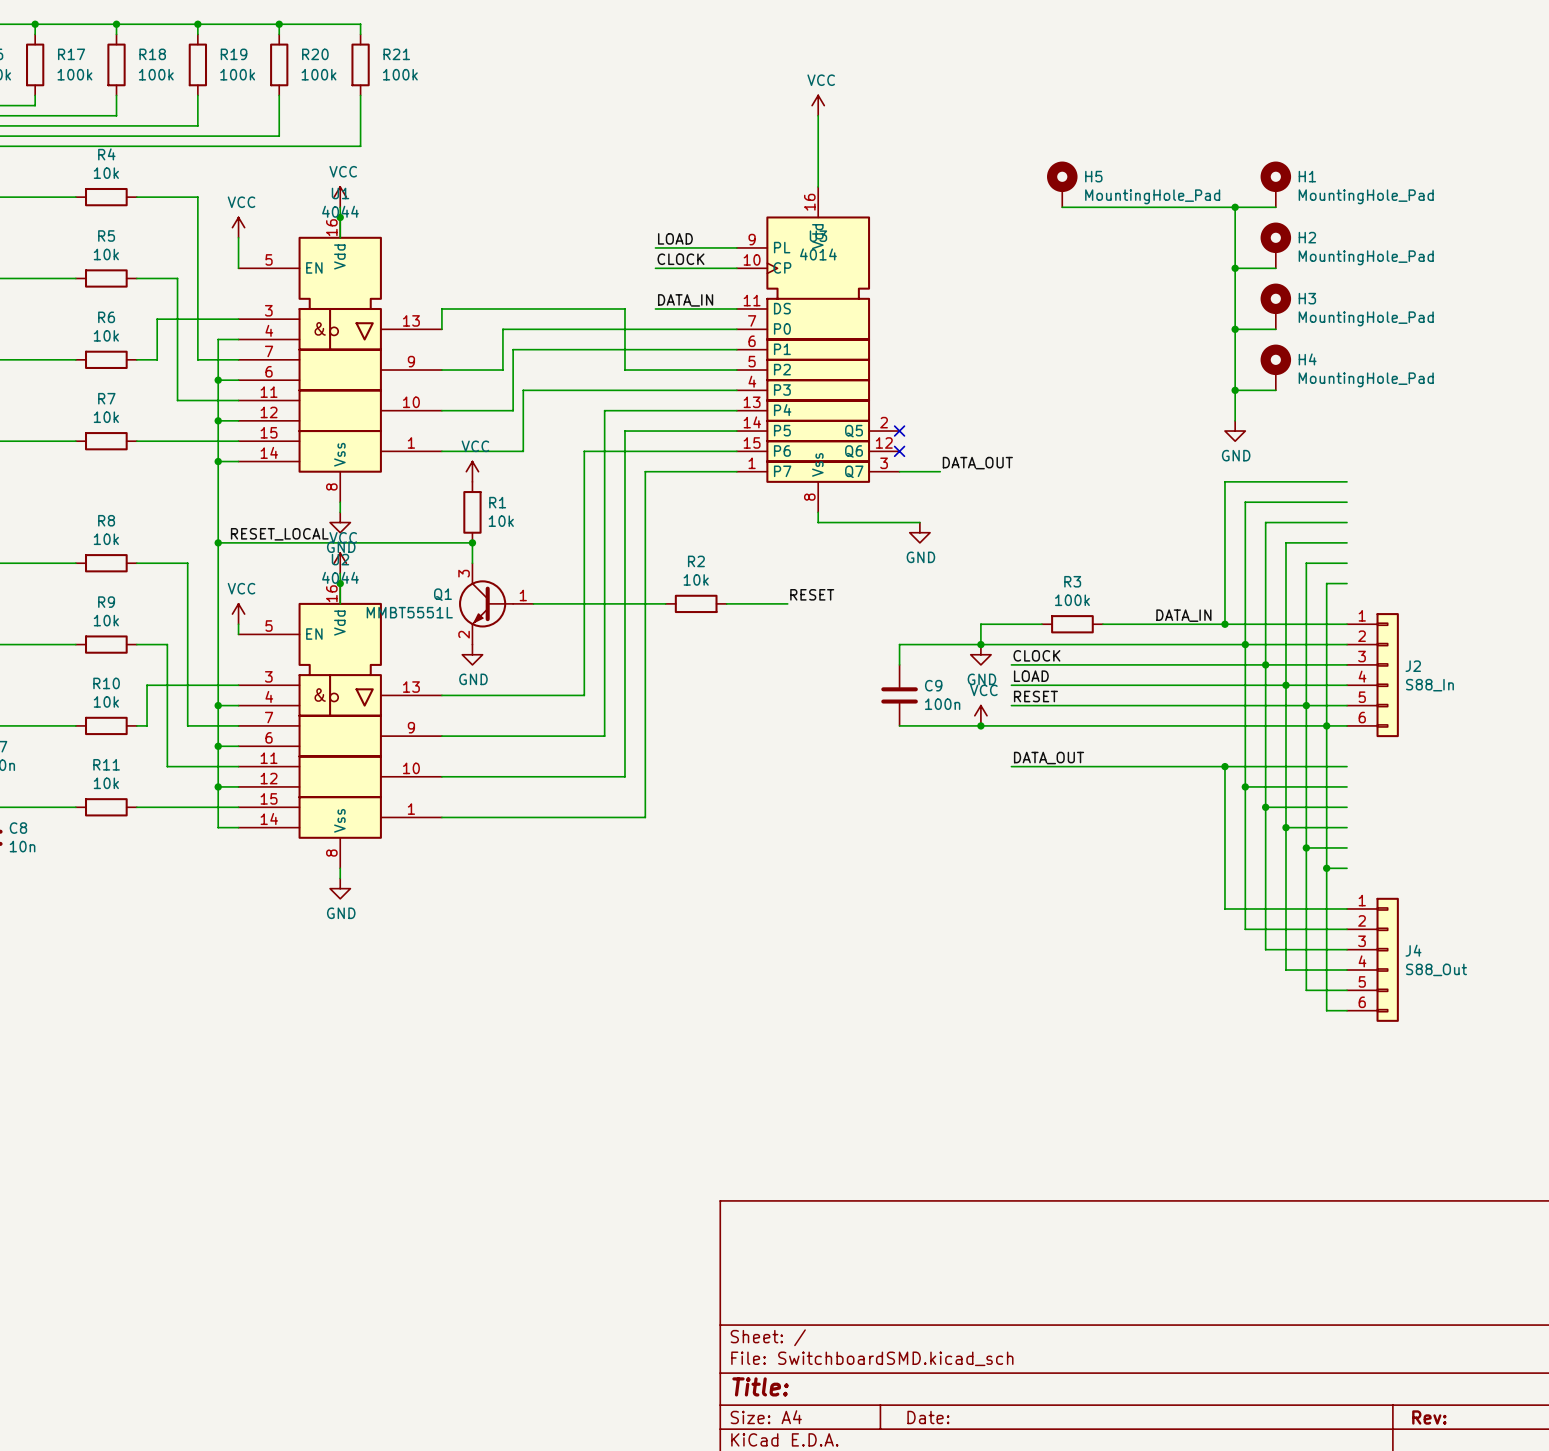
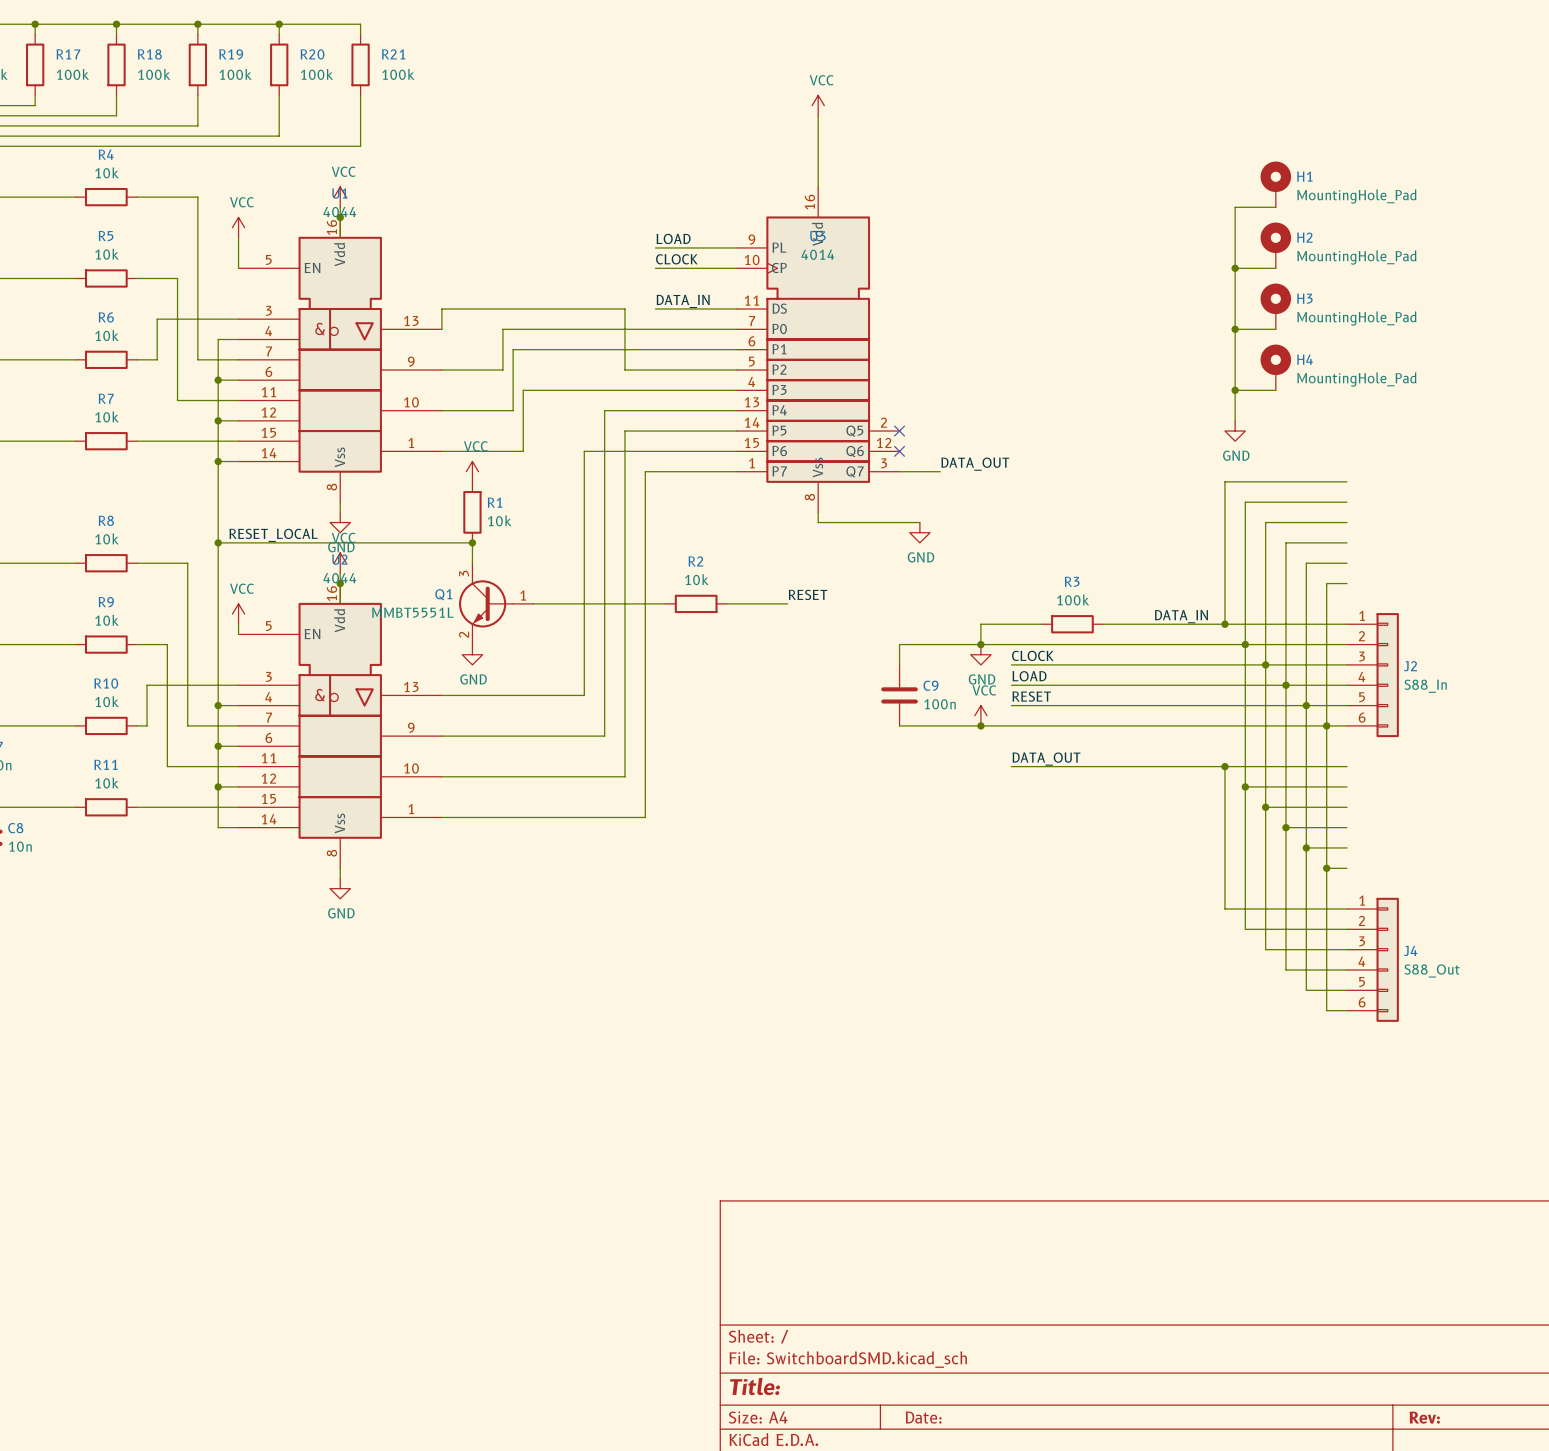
H5: MountingHole_Pad (1062, 184) -> none
wire: (1062, 207) (1235, 207) -> none
junction: (1235, 207) -> none

